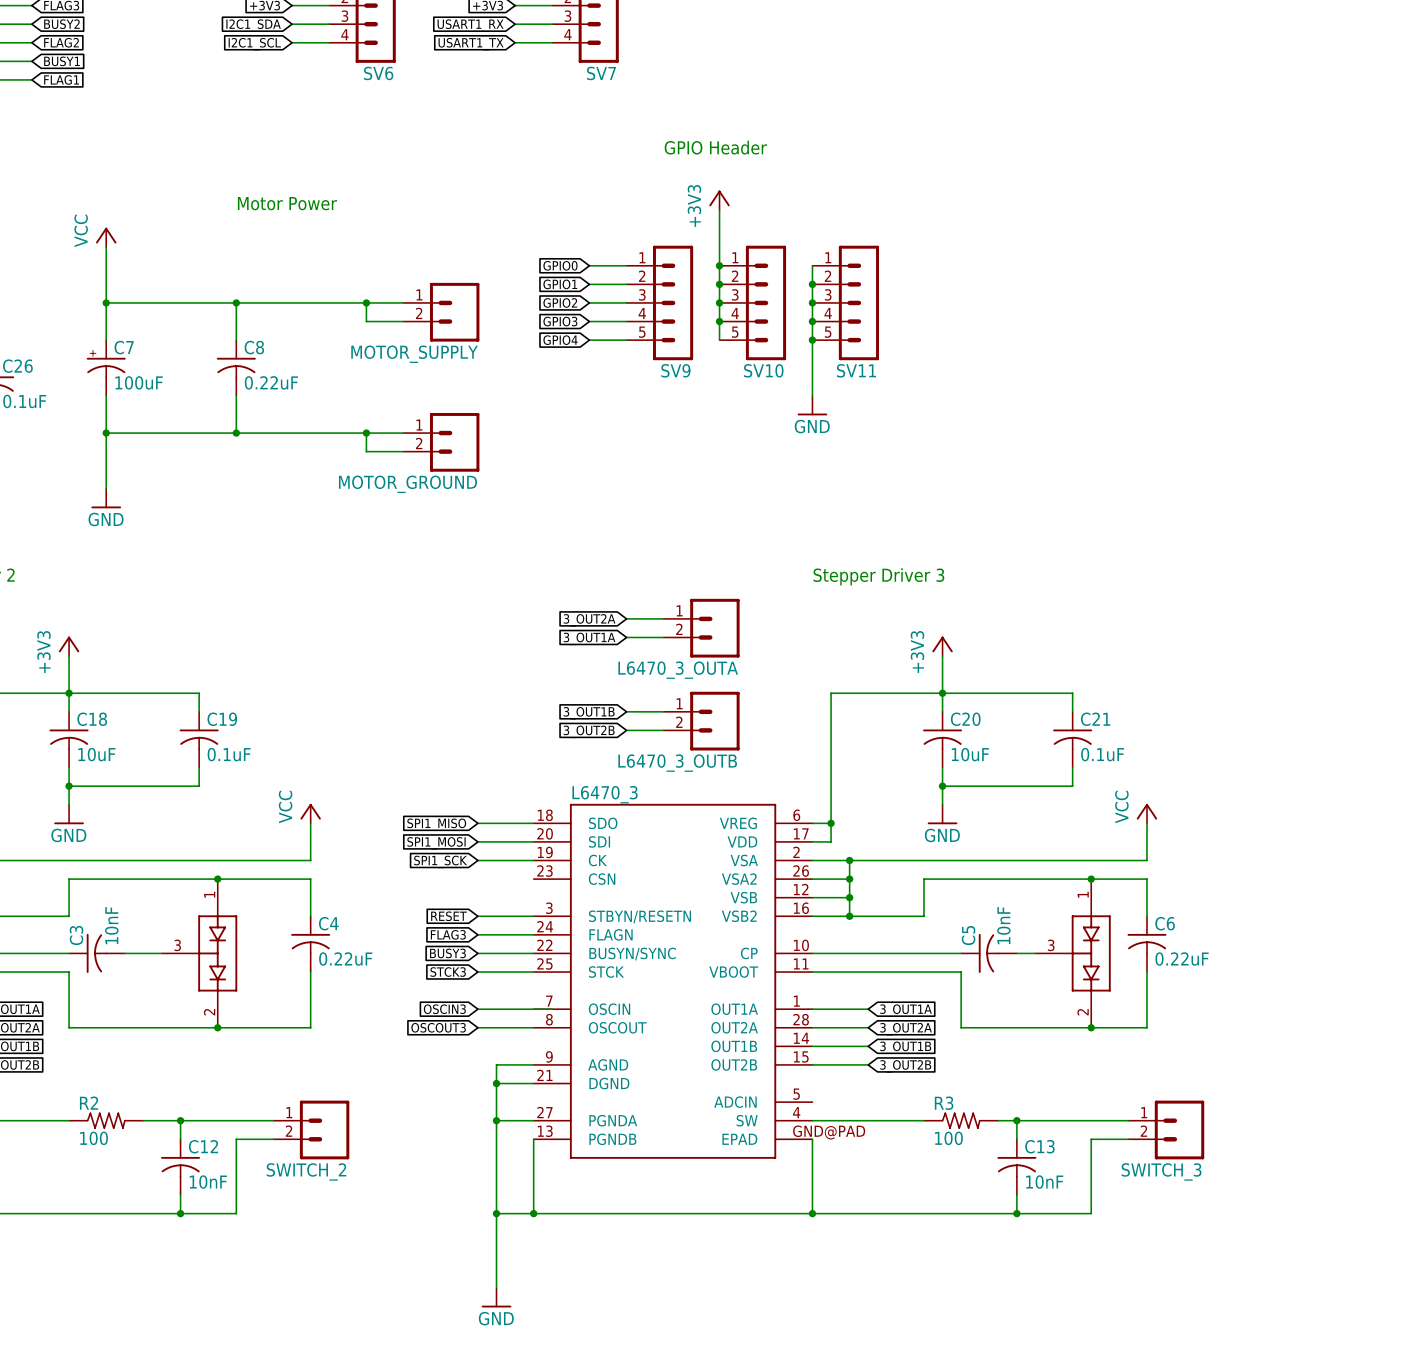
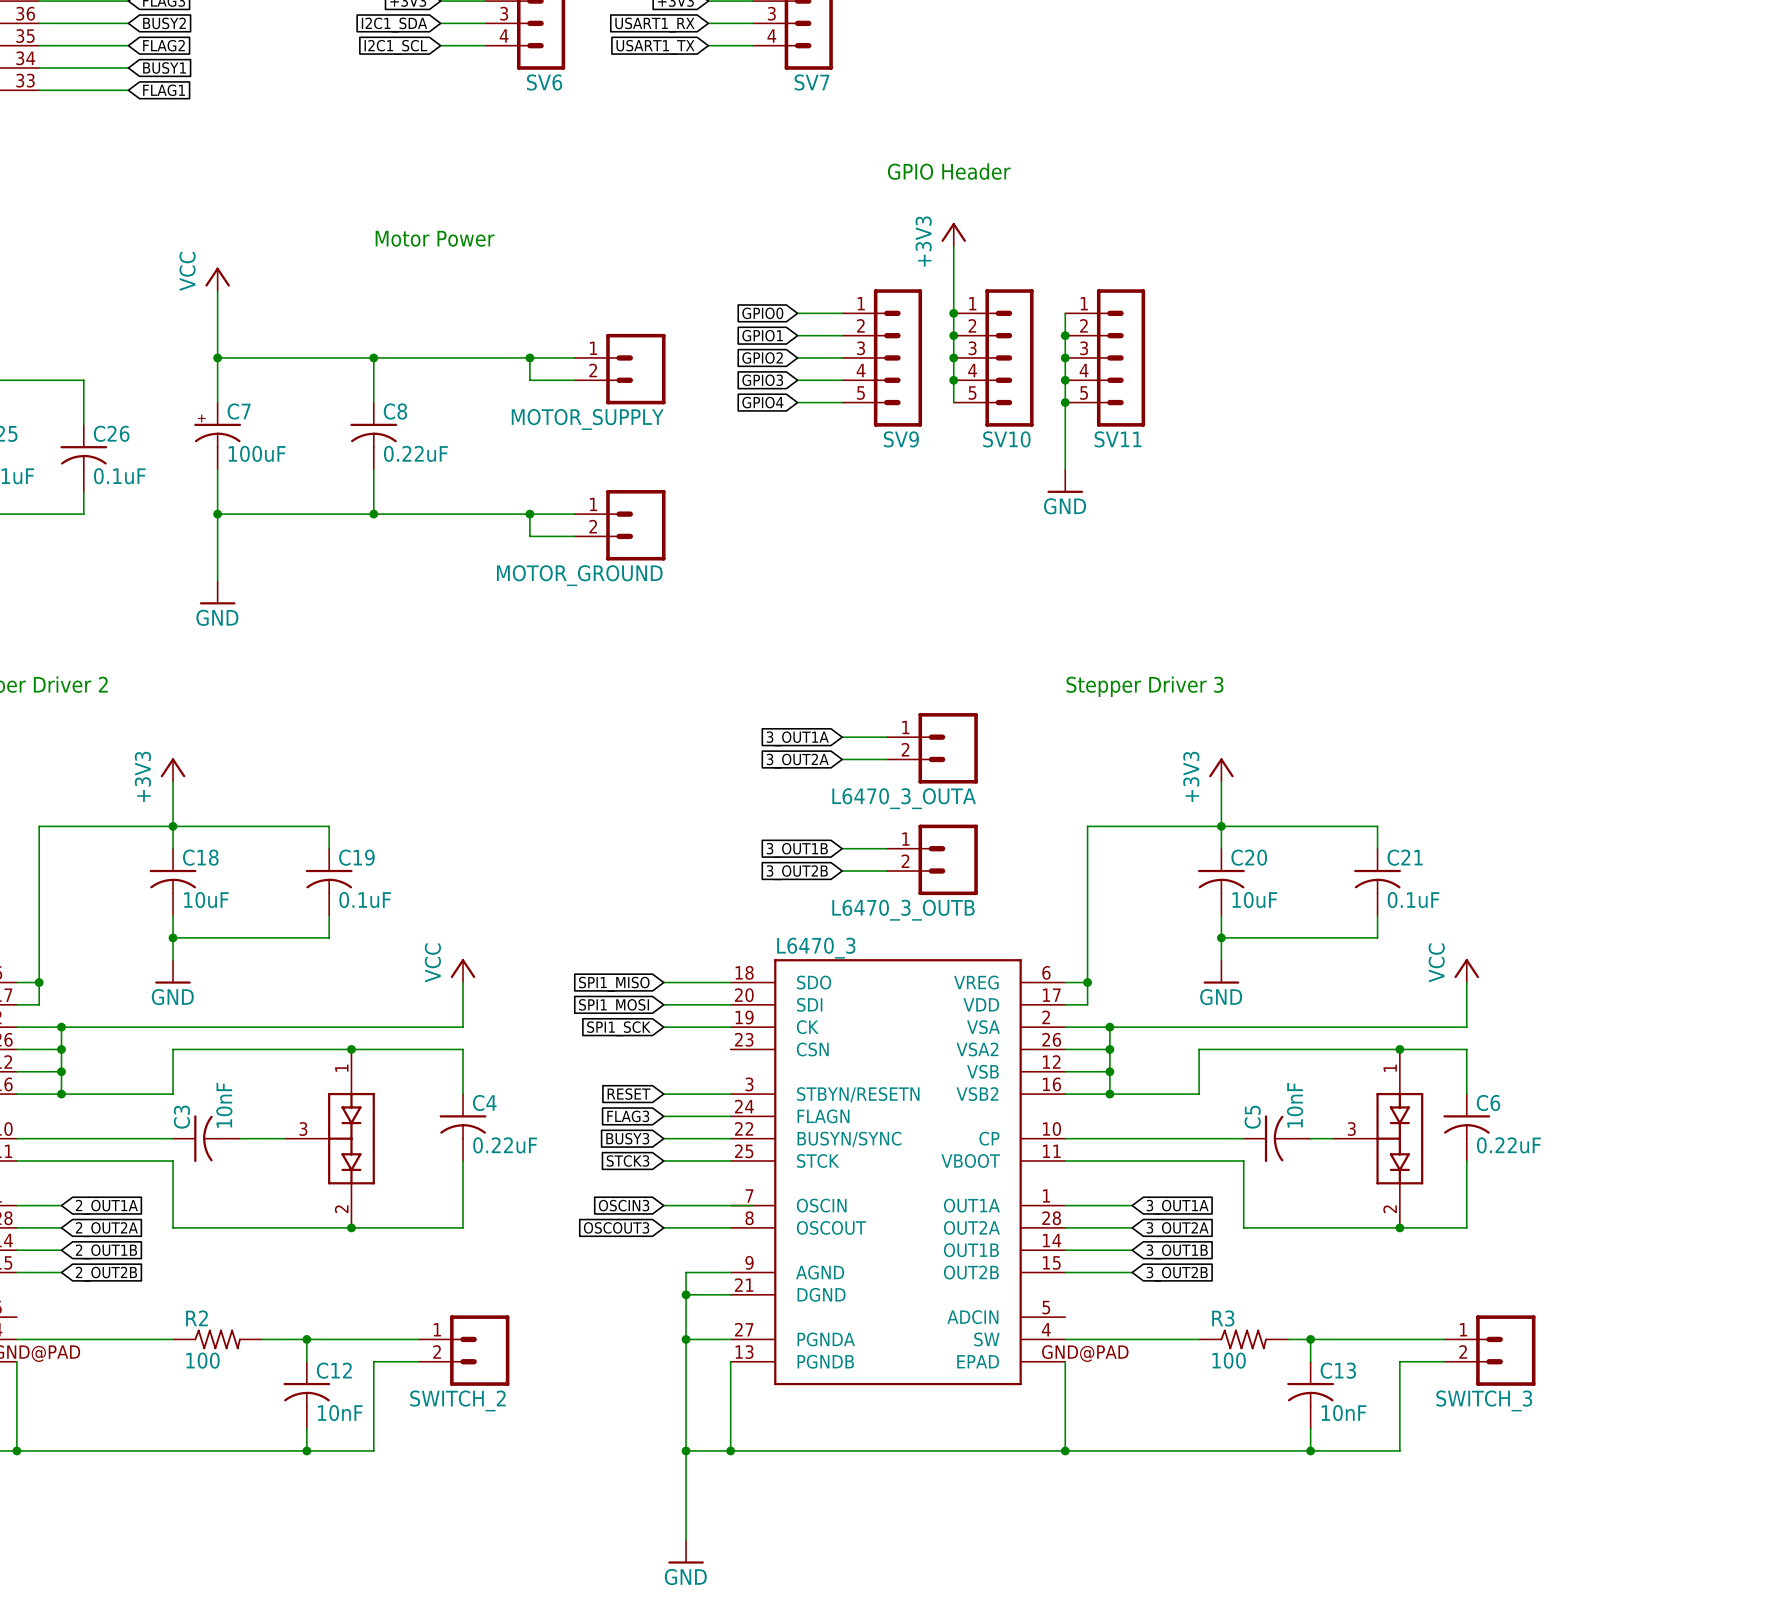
global label: 3_OUT2A (589, 620) -> 3_OUT1A (797, 738)
global label: 3_OUT1A (589, 638) -> 3_OUT2A (797, 761)

